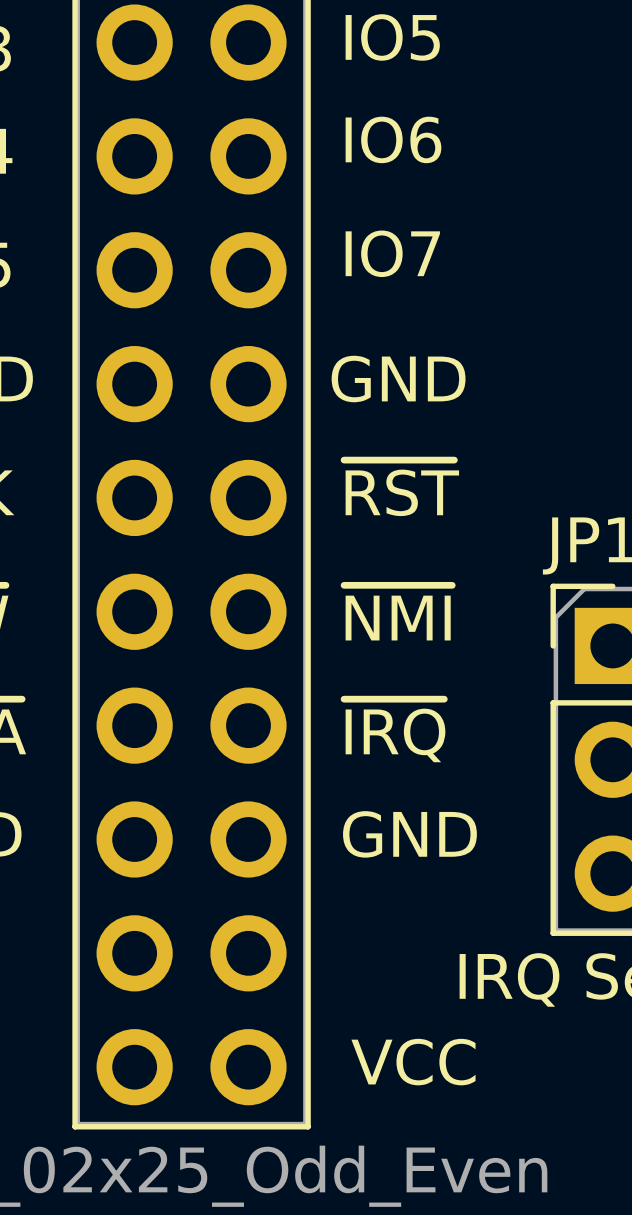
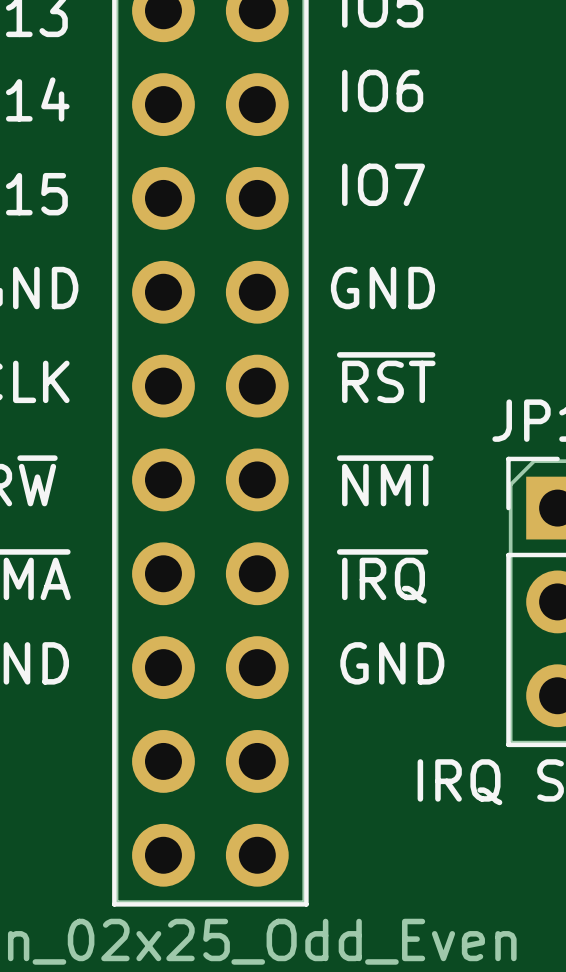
text: VCC (413, 1062) -> none

